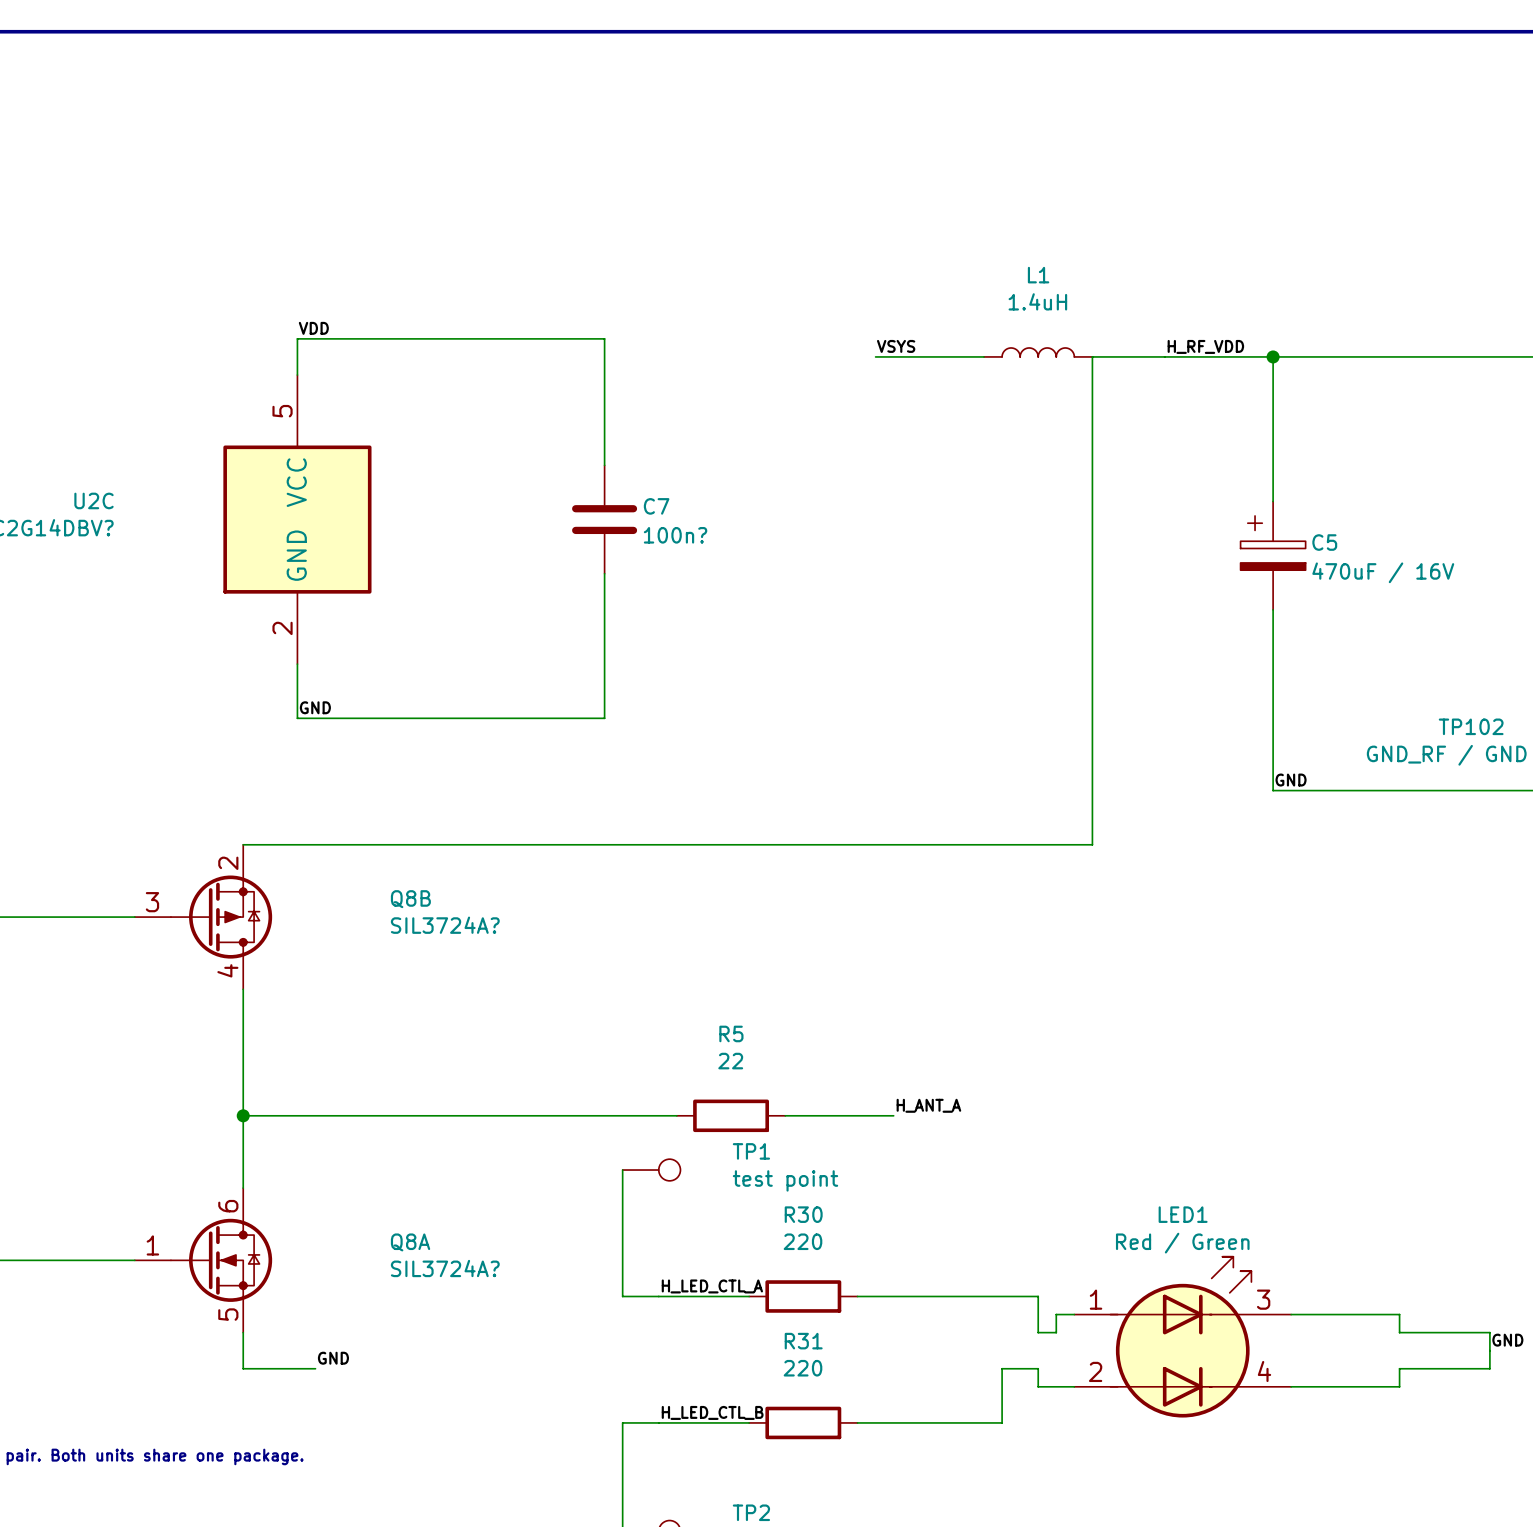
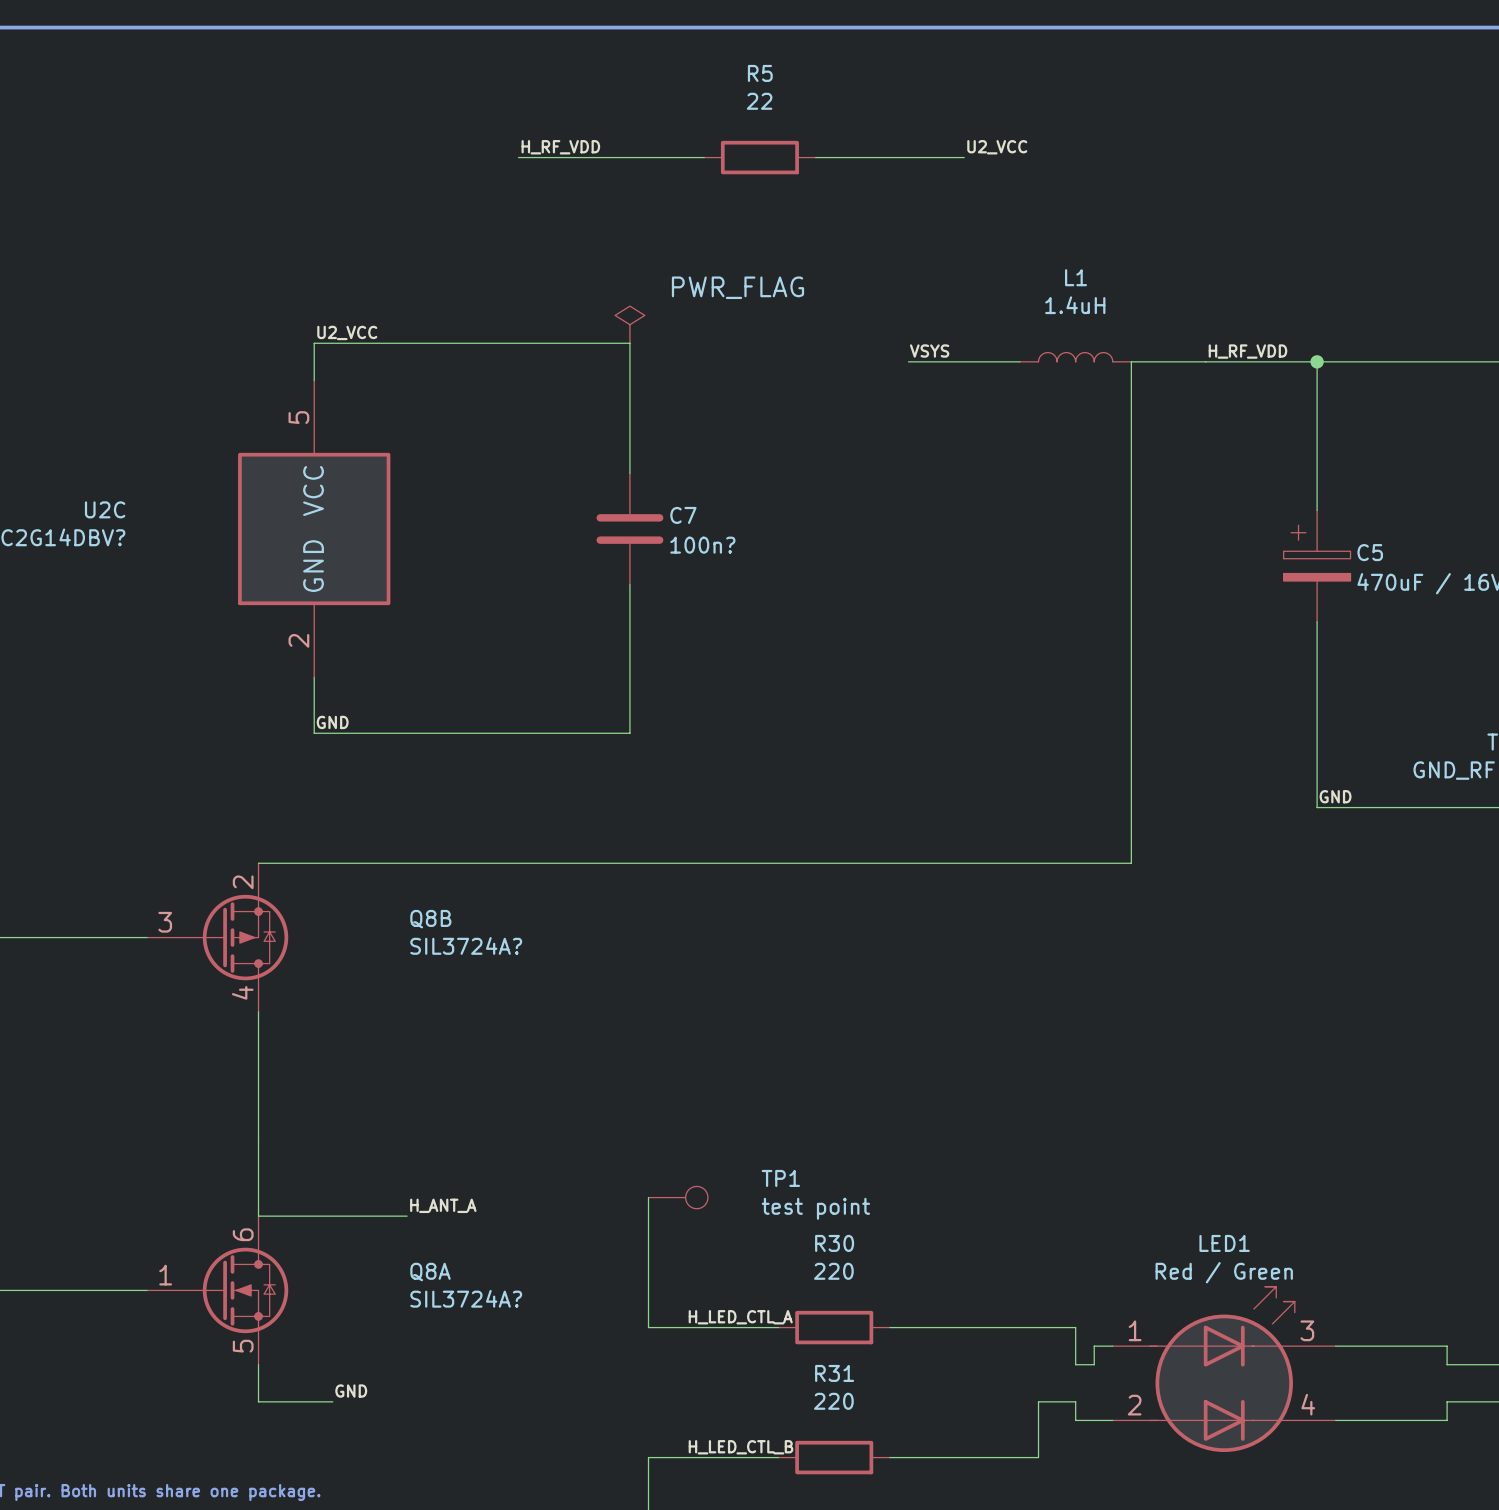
label: none -> H_RF_VDD (560, 147)
label: none -> U2_VCC (997, 147)
wire: none -> (518, 157) (704, 157)
wire: none -> (815, 157) (964, 157)
power symbol: none -> PWR_FLAG (629, 324)
label: VDD (313, 328) -> U2_VCC (347, 332)
label: H_ANT_A (928, 1105) -> none
wire: (243, 1115) (676, 1115) -> none
junction: (243, 1115) -> none
R5 position: (731, 1115) -> (759, 157)
wire: (785, 1115) (893, 1115) -> none
label: none -> H_ANT_A (443, 1205)
wire: none -> (258, 1216) (407, 1216)

